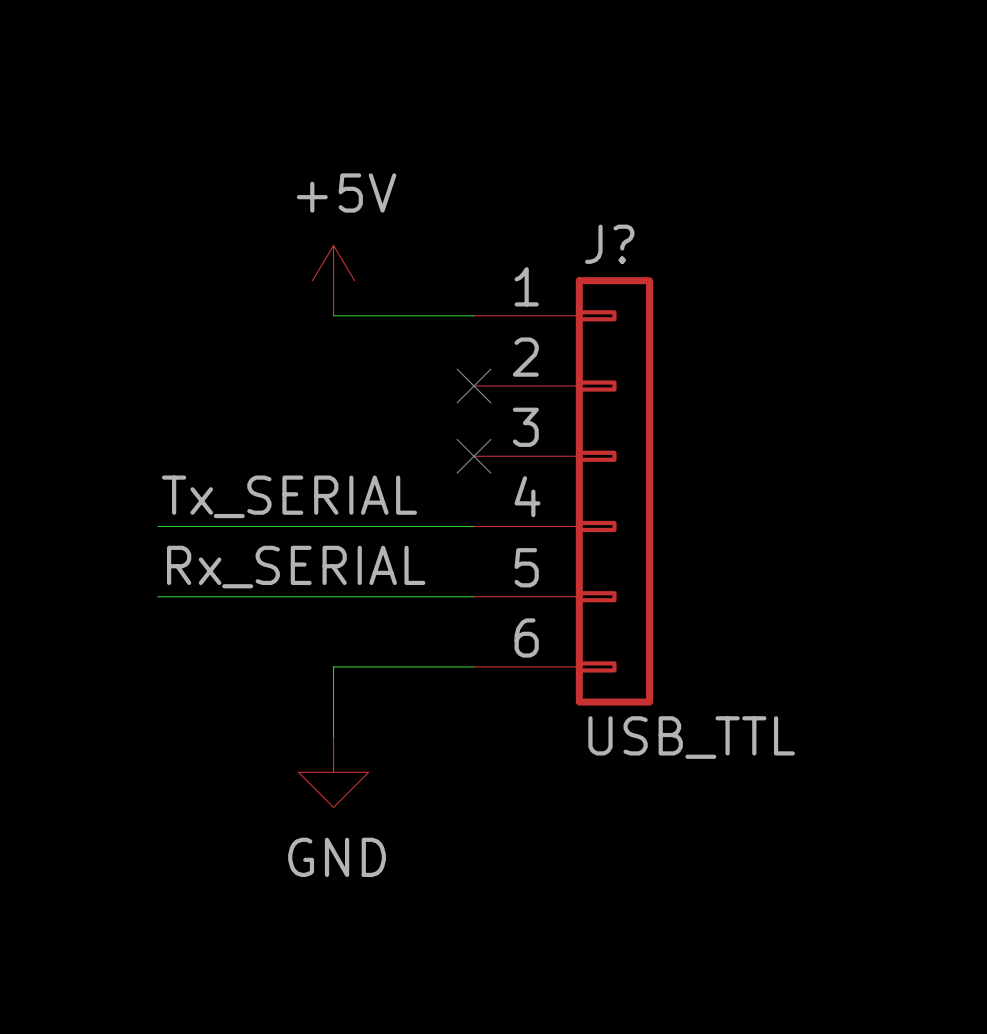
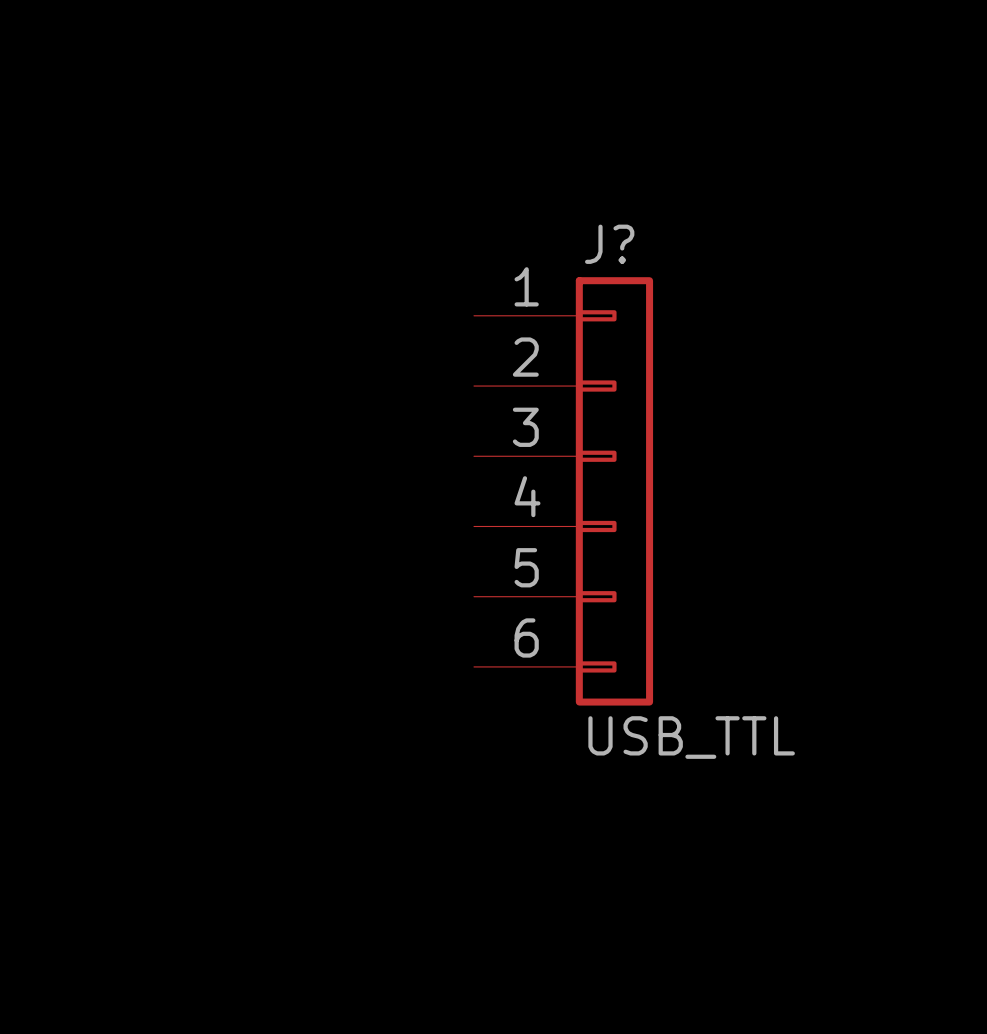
power symbol: +5V (333, 280) -> none
wire: (333, 315) (473, 315) -> none
no-connect mark: (473, 386) -> none
no-connect mark: (473, 456) -> none
label: Tx_SERIAL (289, 496) -> none
wire: (157, 526) (473, 526) -> none
label: Rx_SERIAL (296, 567) -> none
wire: (157, 596) (473, 596) -> none
wire: (473, 666) (333, 666) (333, 737) -> none
power symbol: GND (333, 772) -> none

